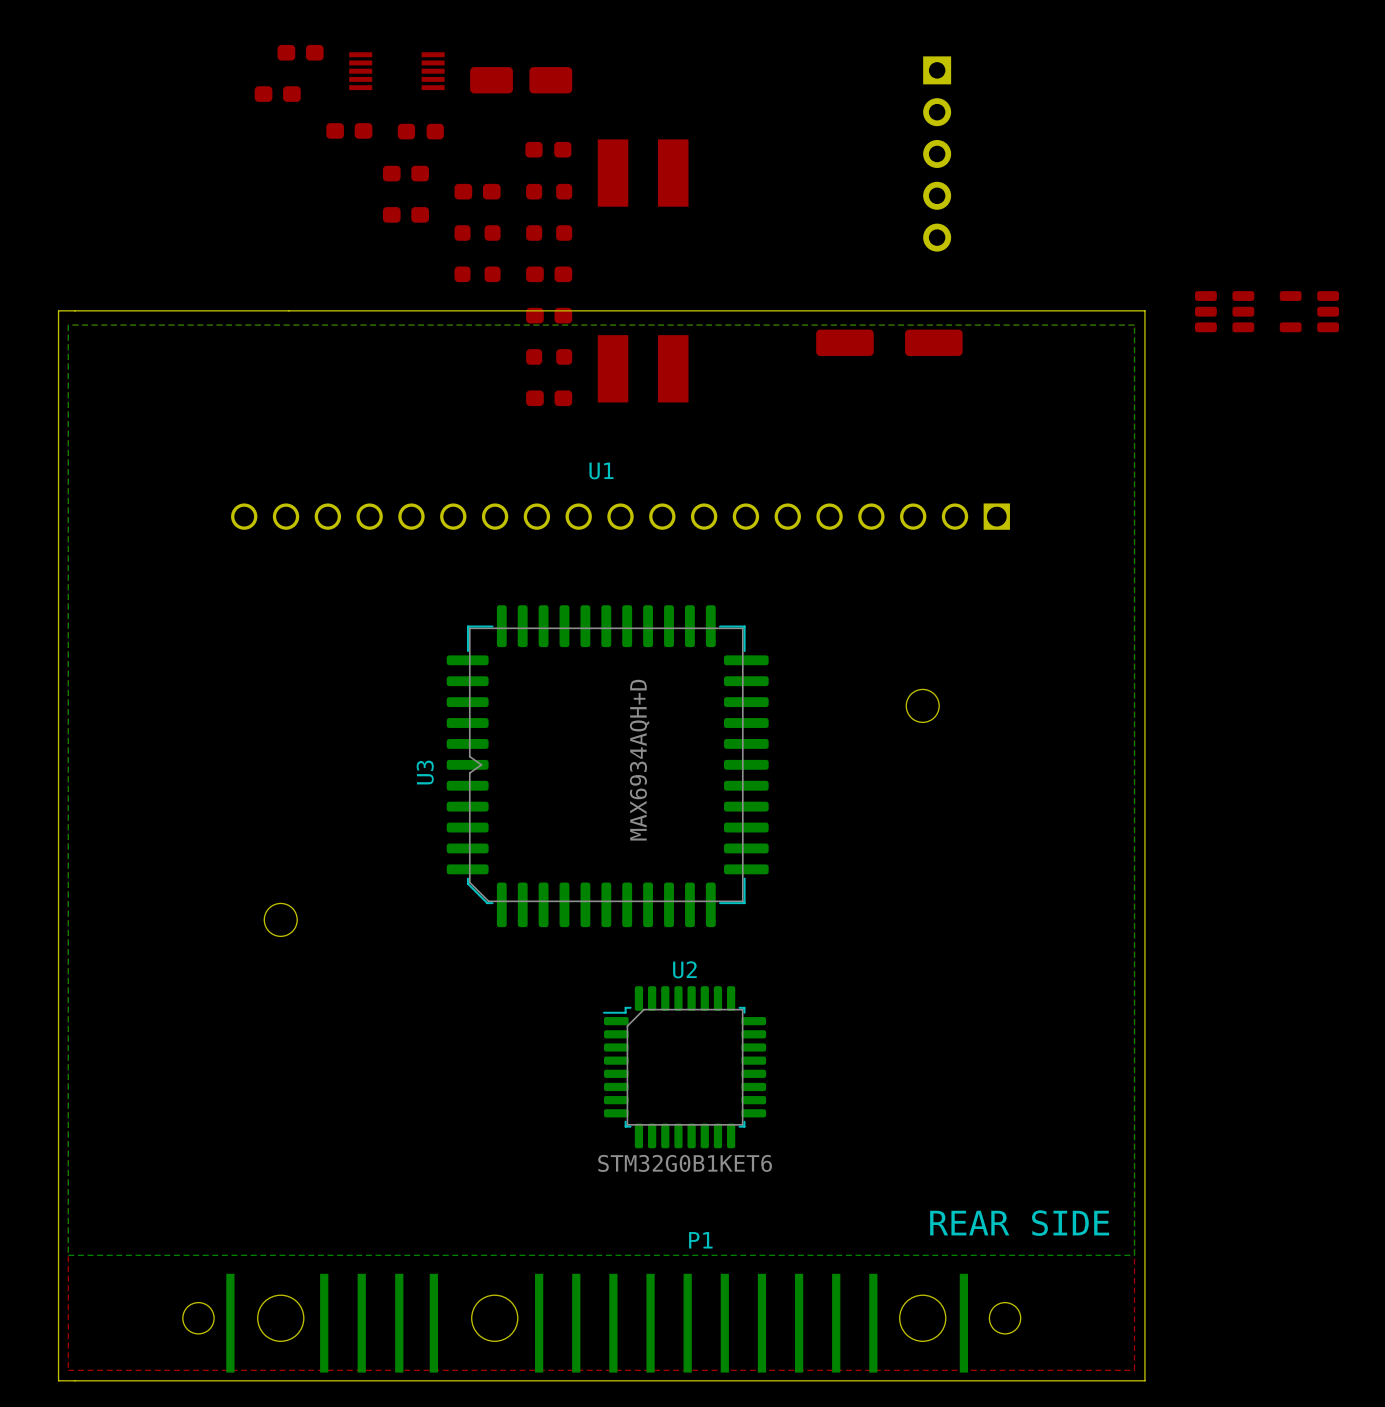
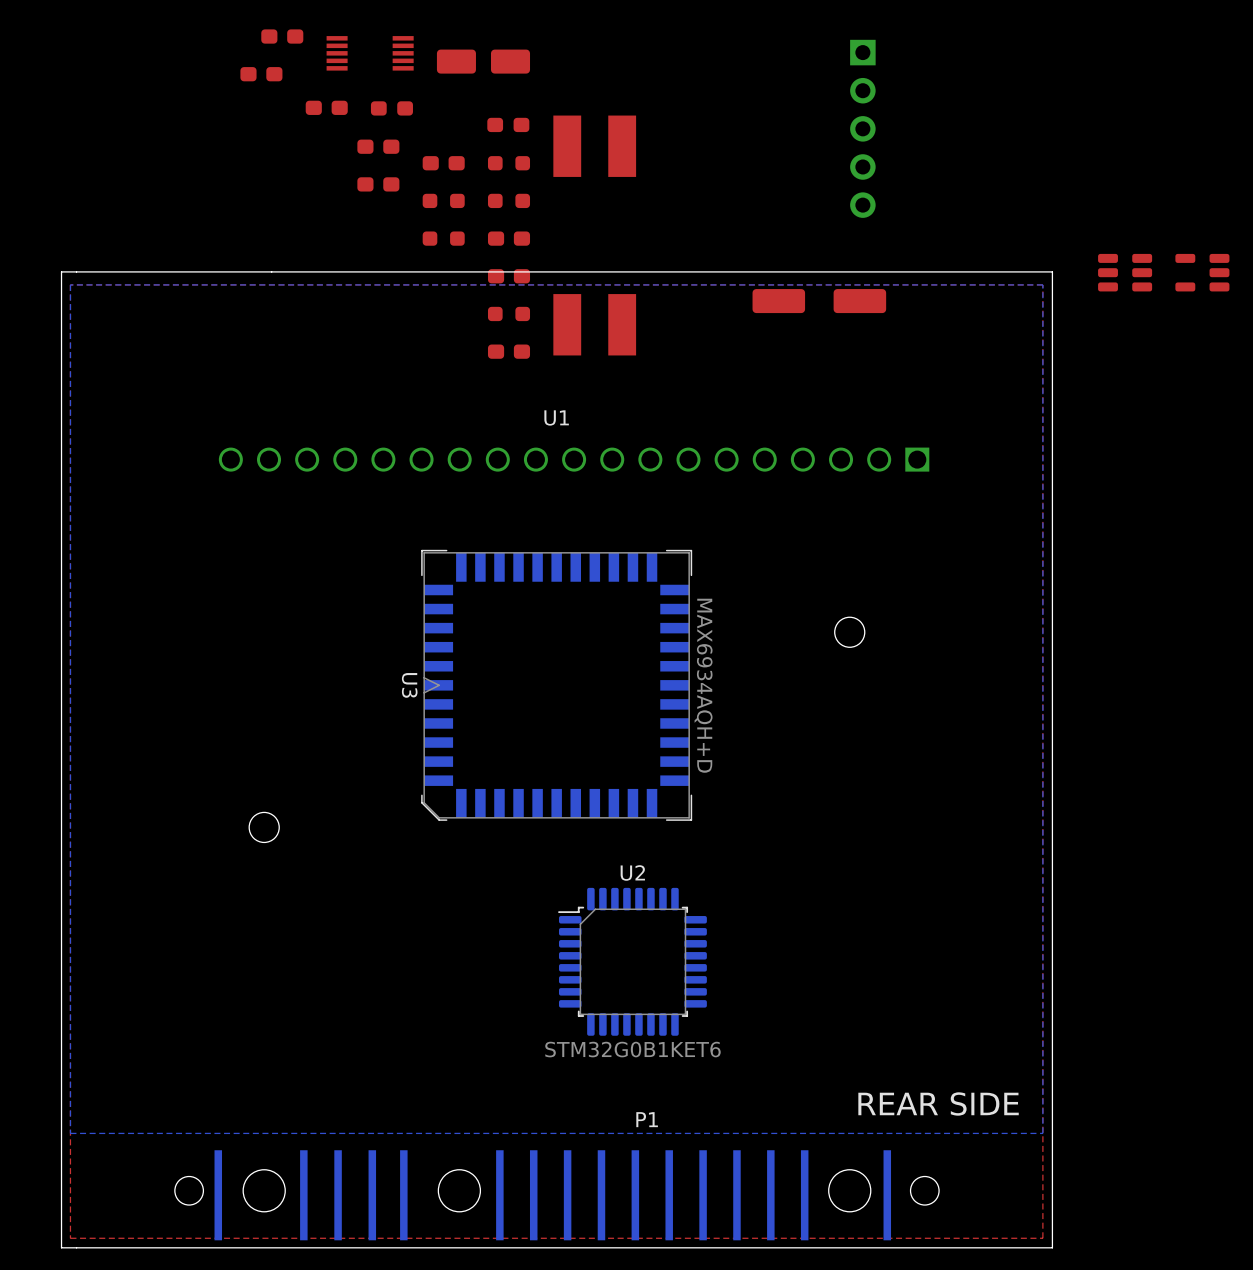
U3 footprint: [446, 605, 769, 928] -> [421, 549, 693, 821]
U3 value position: MAX6934AQH+D (639, 760) -> MAX6934AQH+D (703, 685)

